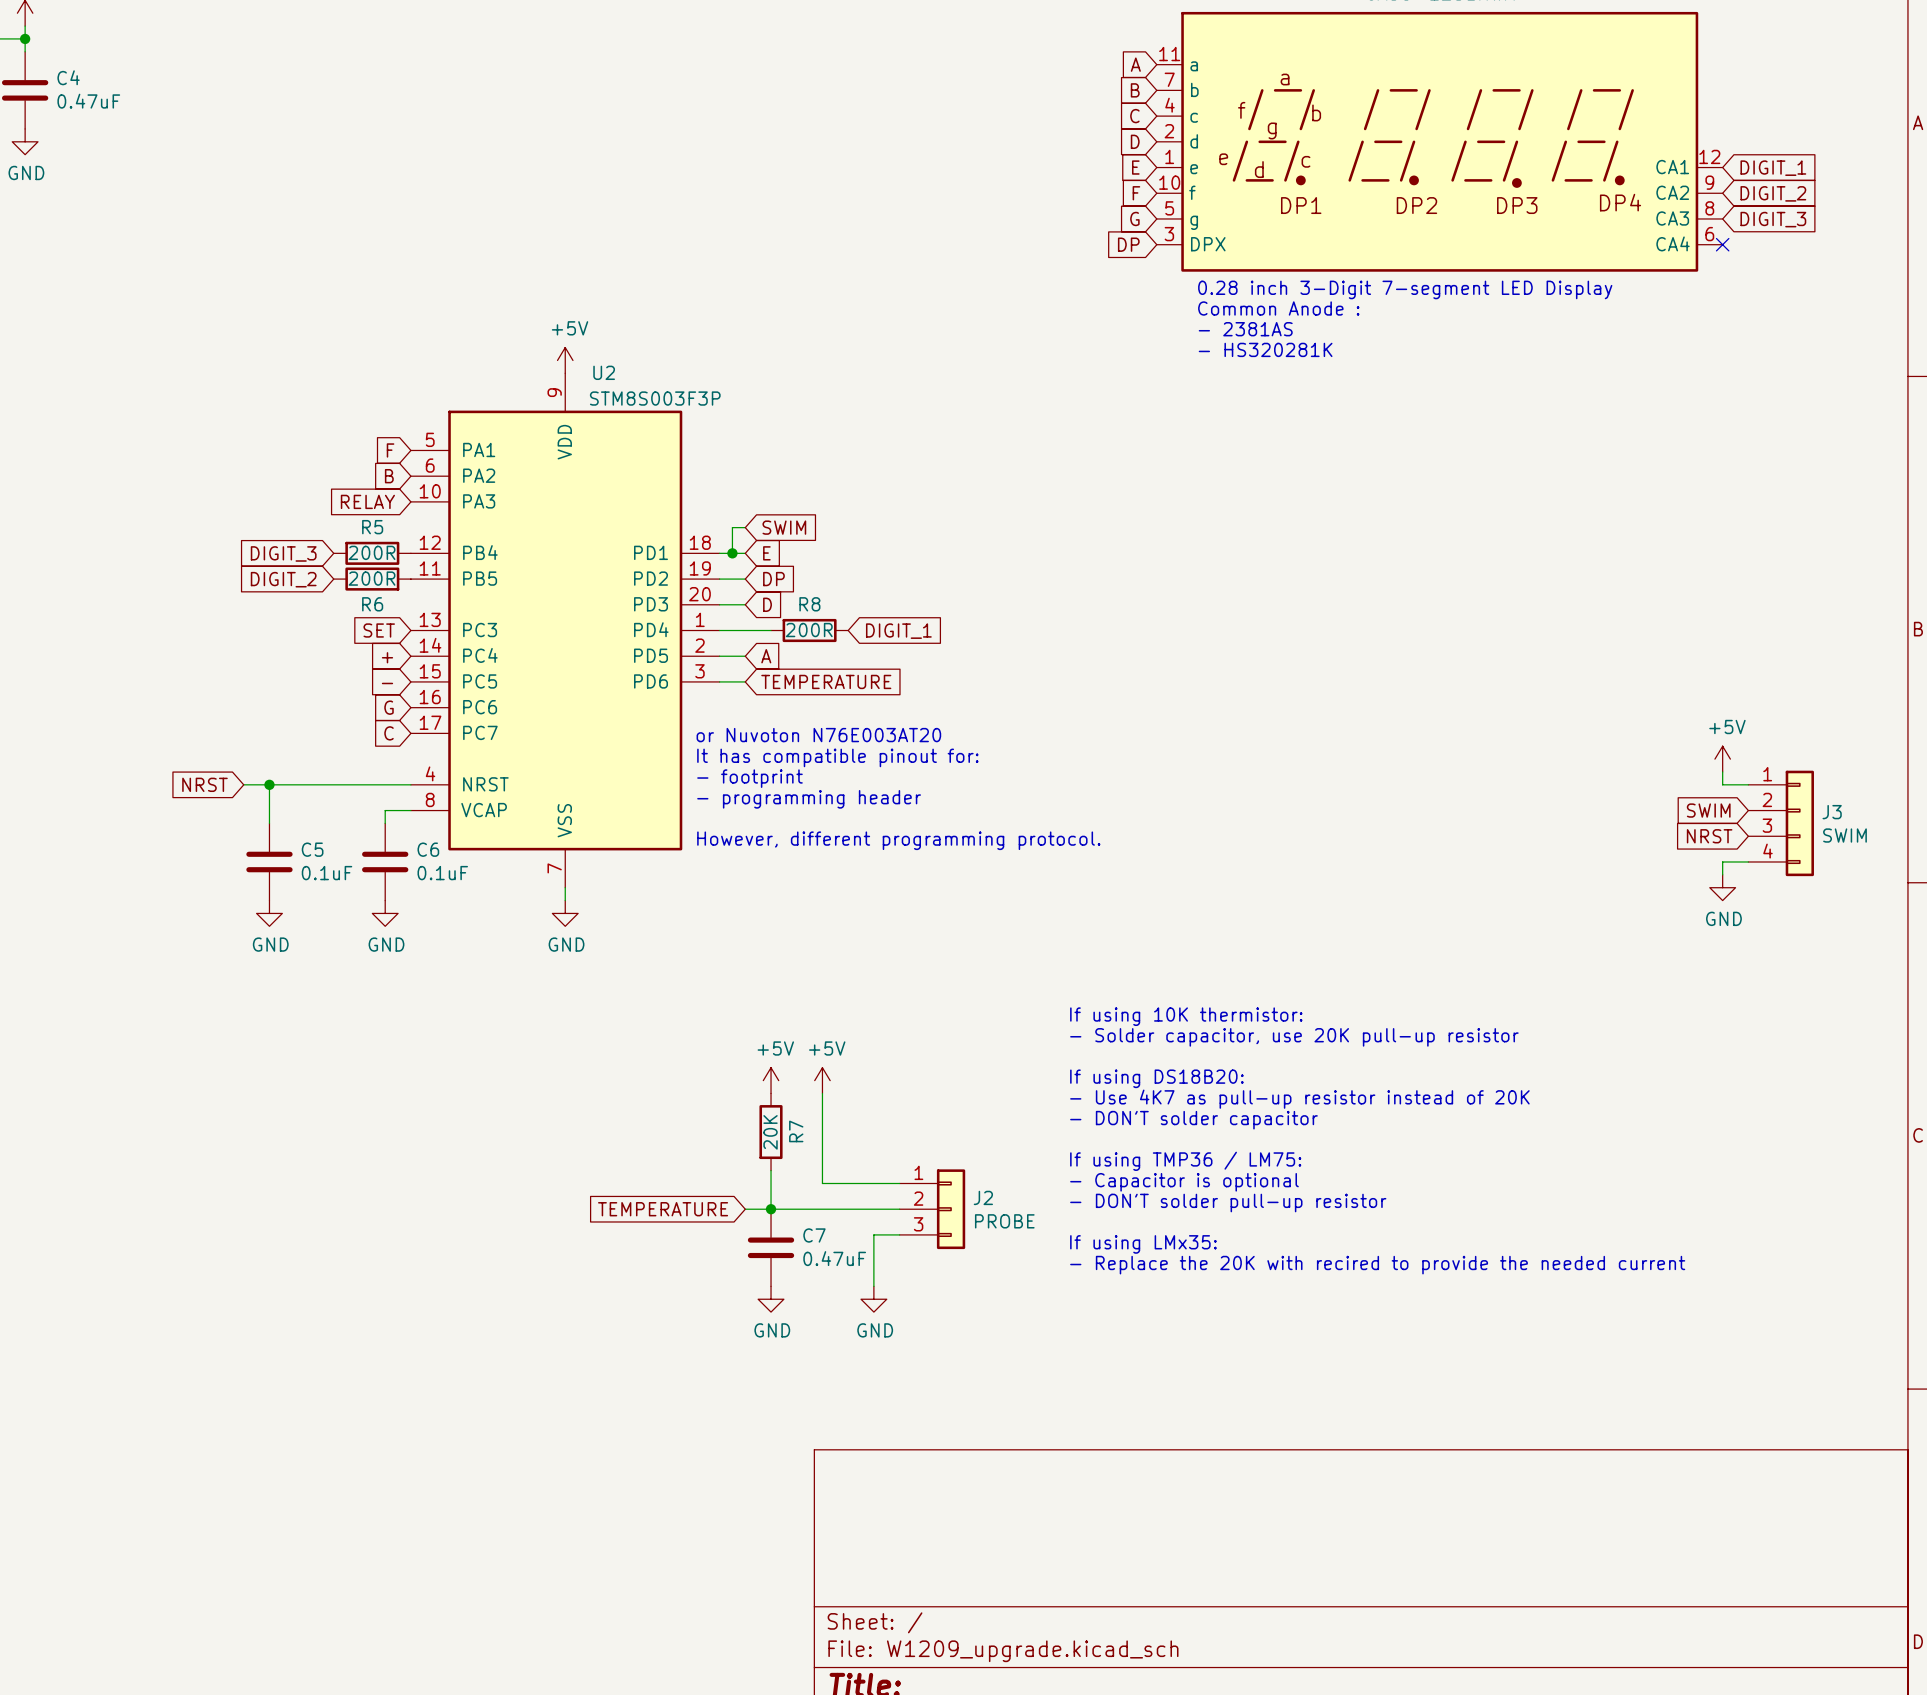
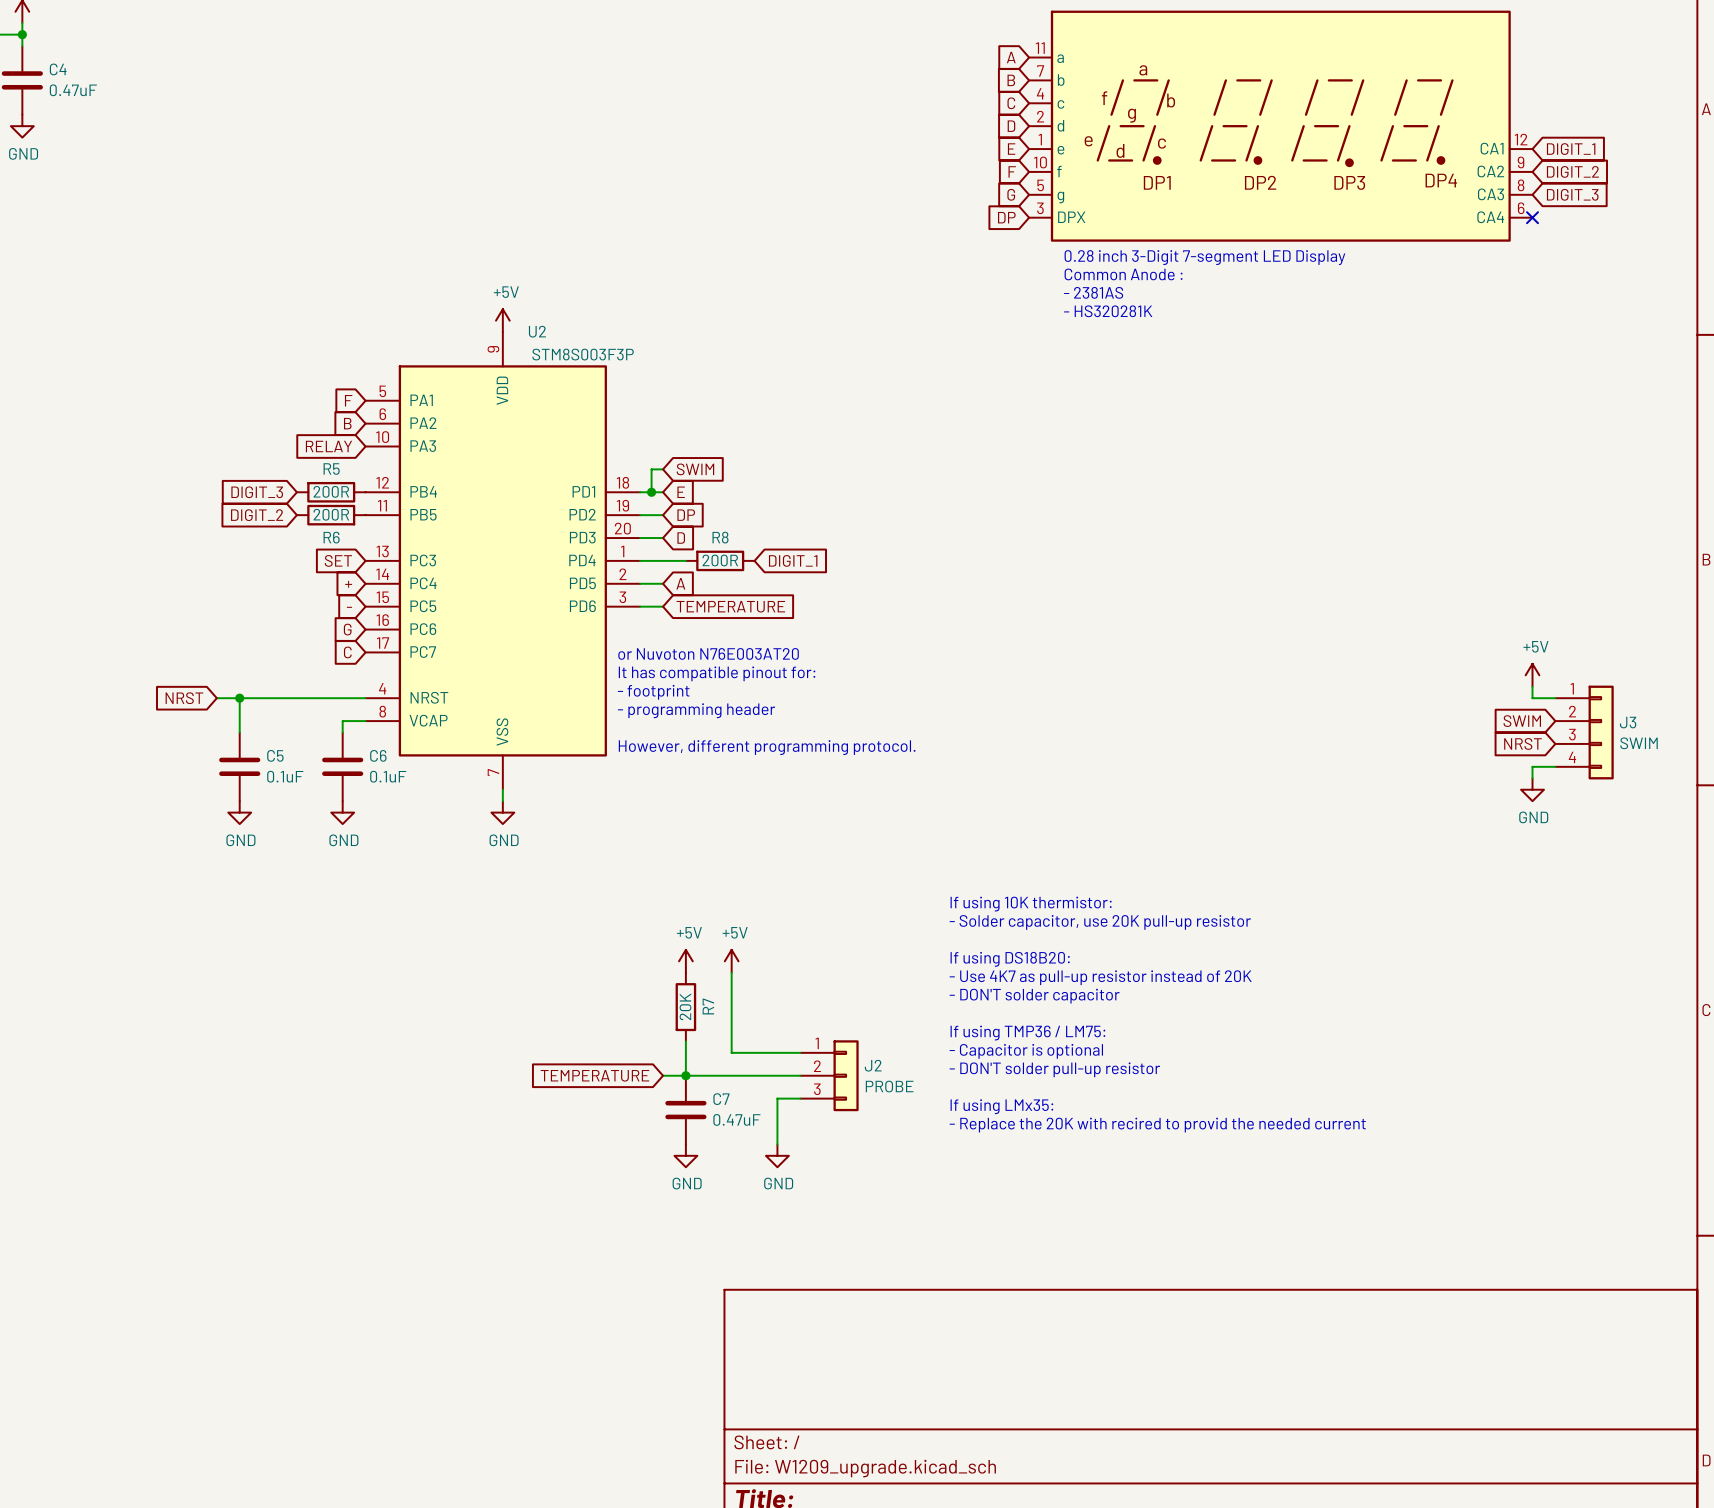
text: - Replace the 20K with recired to provide the needed current (1377, 1265) -> - Replace the 20K with recired to provid the needed current (1157, 1125)

